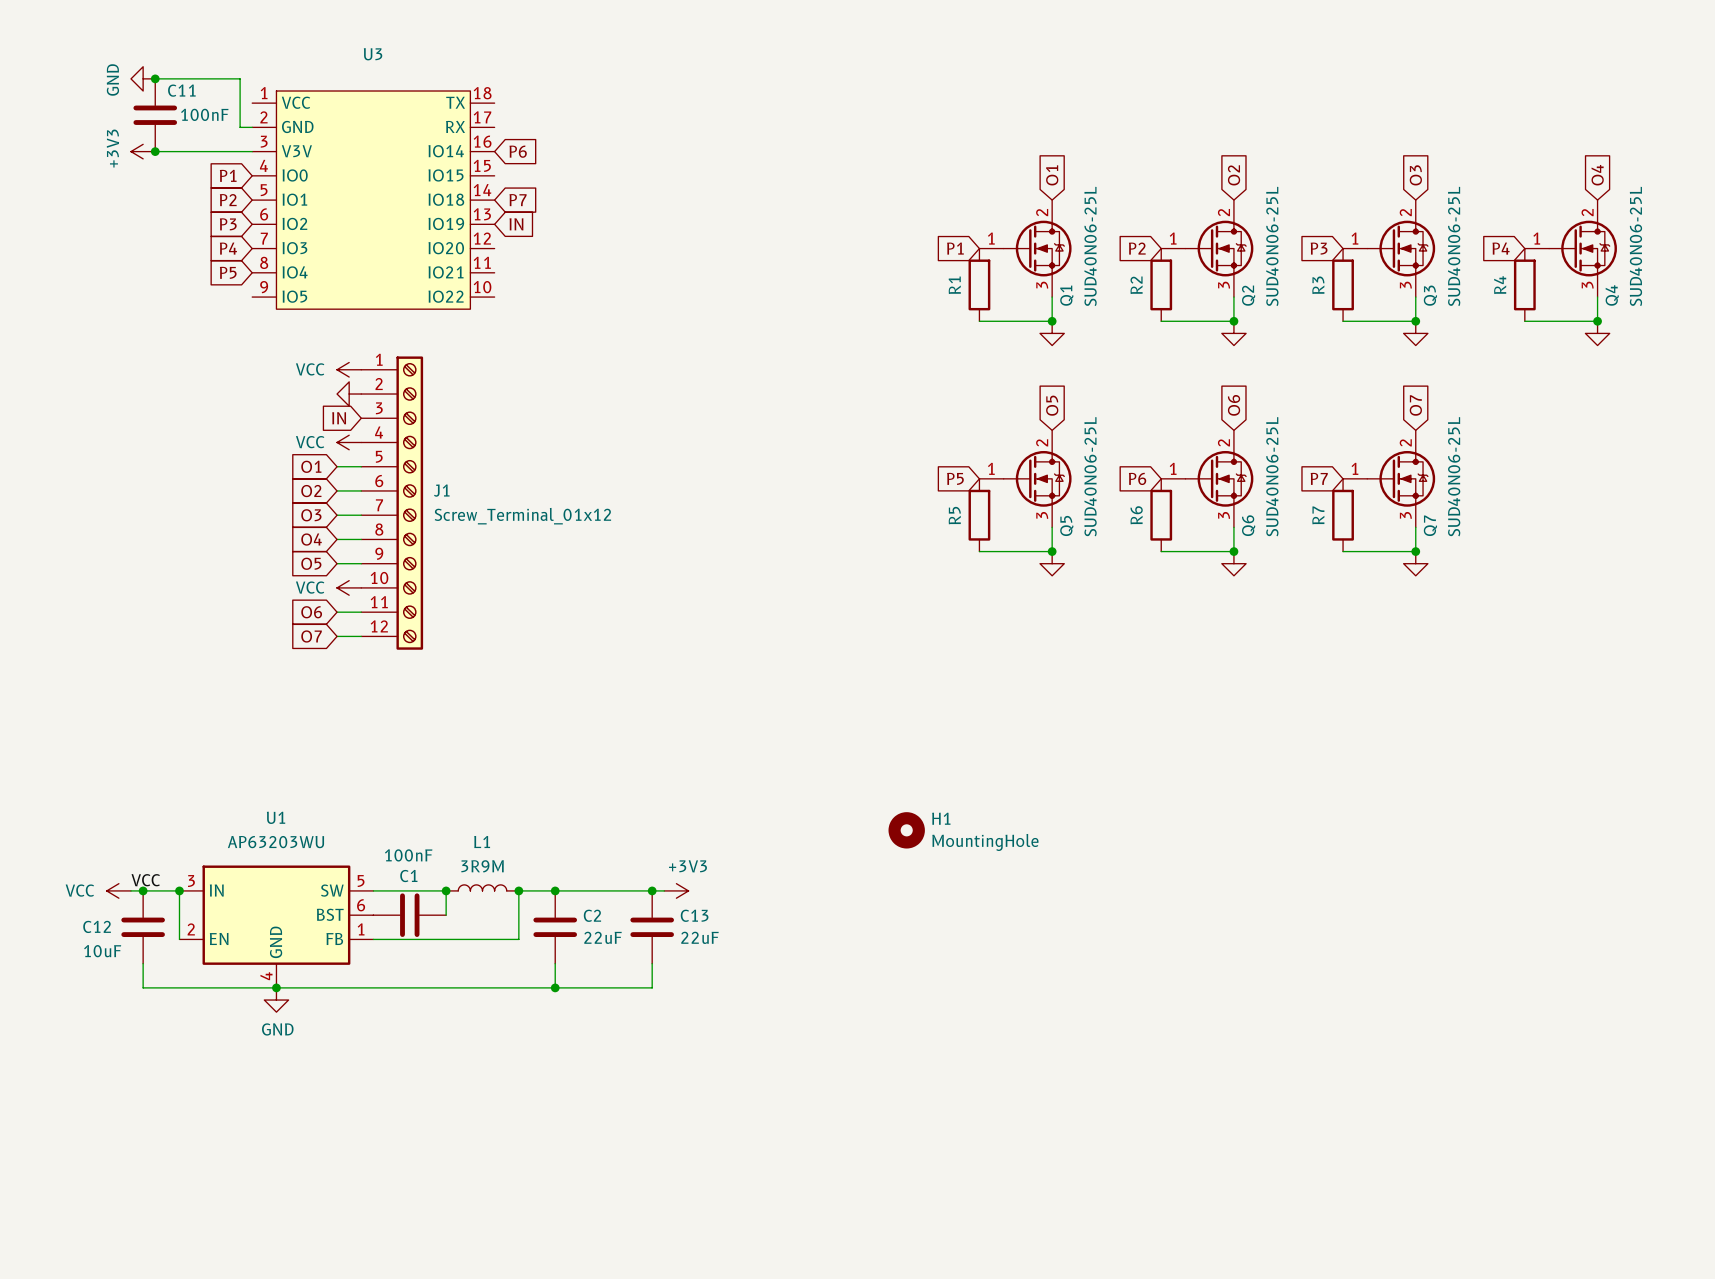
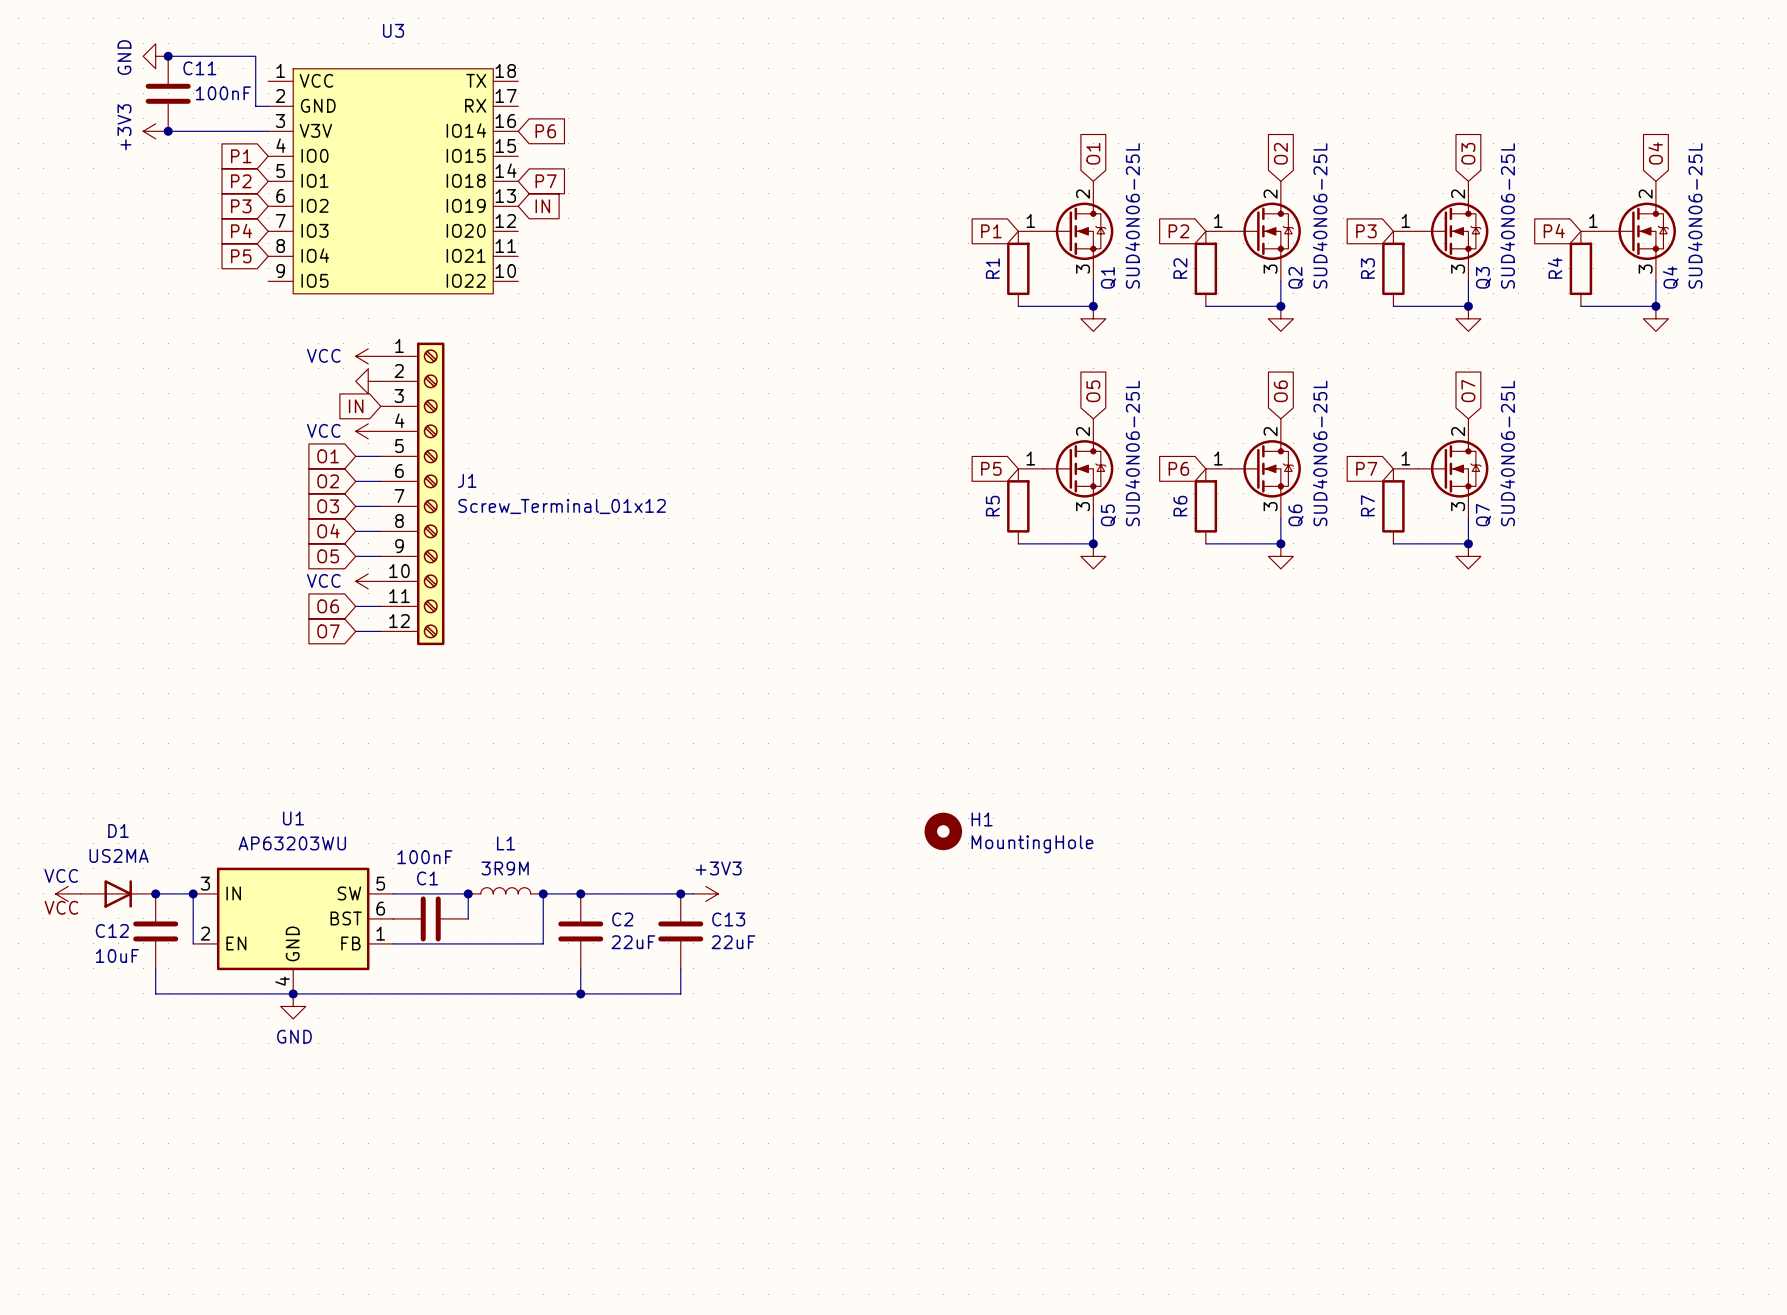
label position: VCC (145, 880) -> VCC (61, 907)
power symbol text position: VCC (79, 890) -> VCC (61, 875)
D1: none -> US2MA (118, 893)
power symbol position: VCC (118, 890) -> VCC (68, 893)

